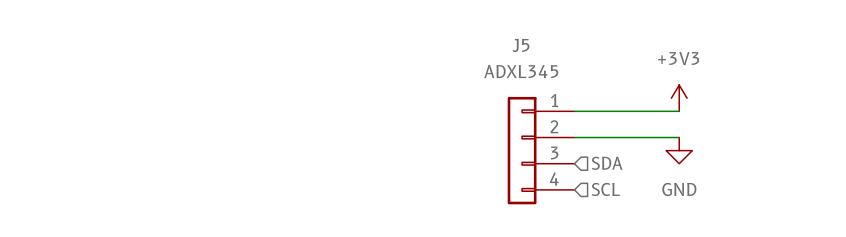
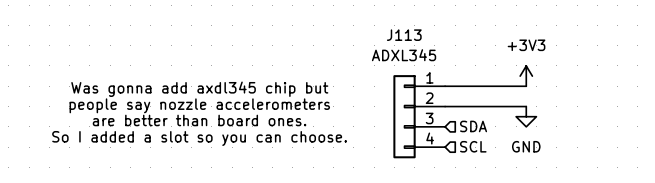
J5 name: J5 (521, 45) -> J113 (404, 35)
text: none -> Was gonna add axdl345 chip but (199, 89)
text: none -> people say nozzle accelerometers (199, 105)
text: none -> are better than board ones. (199, 120)
text: none -> So I added a slot so you can choose. (199, 138)

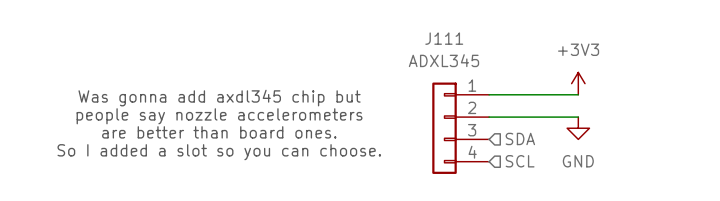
J113 name: J113 (404, 35) -> J111 (444, 38)

